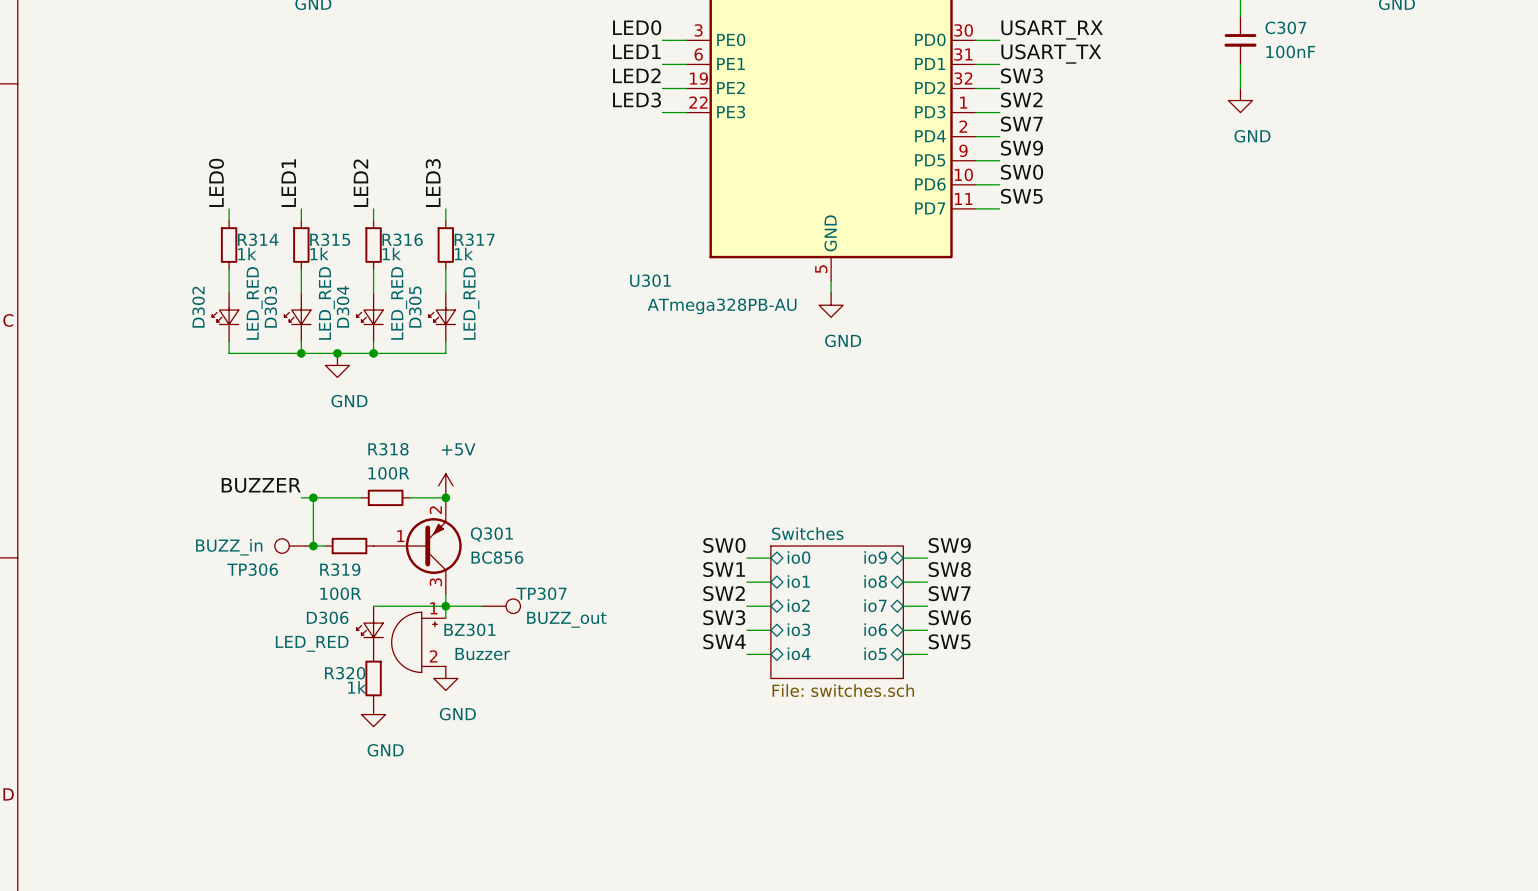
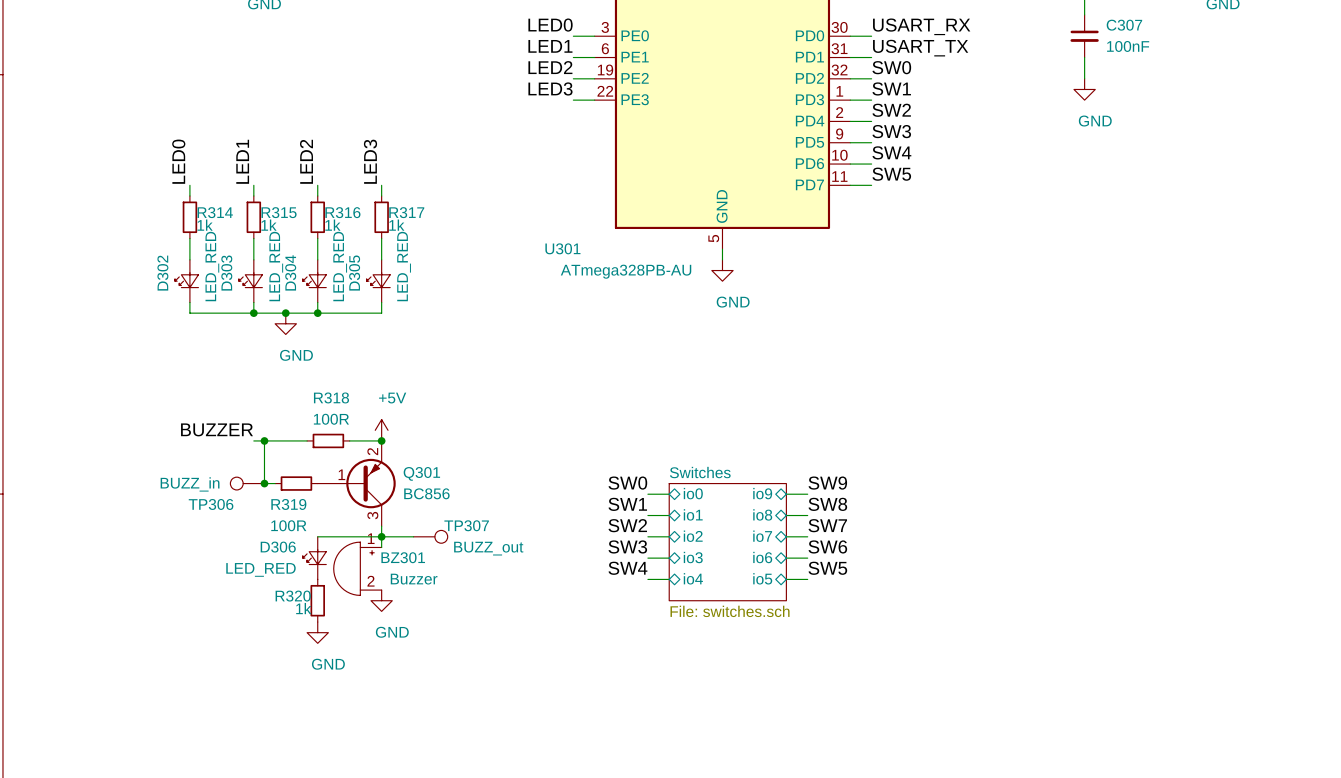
label: SW3 (1021, 75) -> SW0 (891, 67)
label: SW2 (1021, 99) -> SW1 (891, 88)
label: SW7 (1021, 124) -> SW2 (891, 110)
label: SW9 (1022, 148) -> SW3 (891, 131)
label: SW0 (1022, 172) -> SW4 (891, 152)

